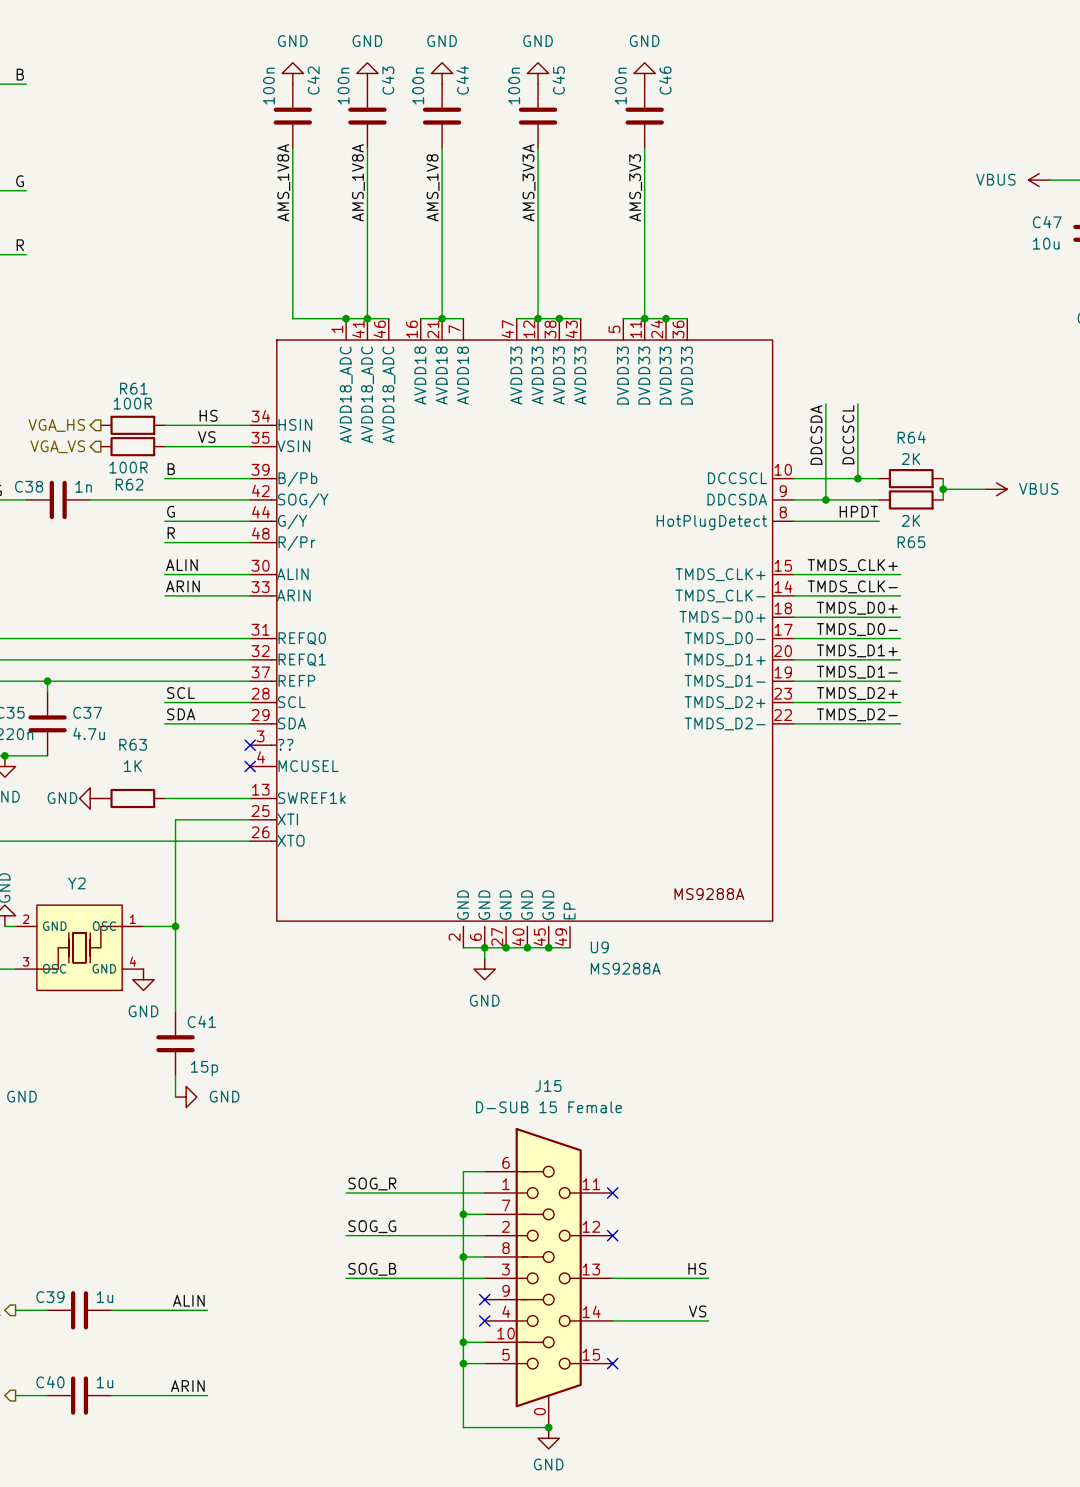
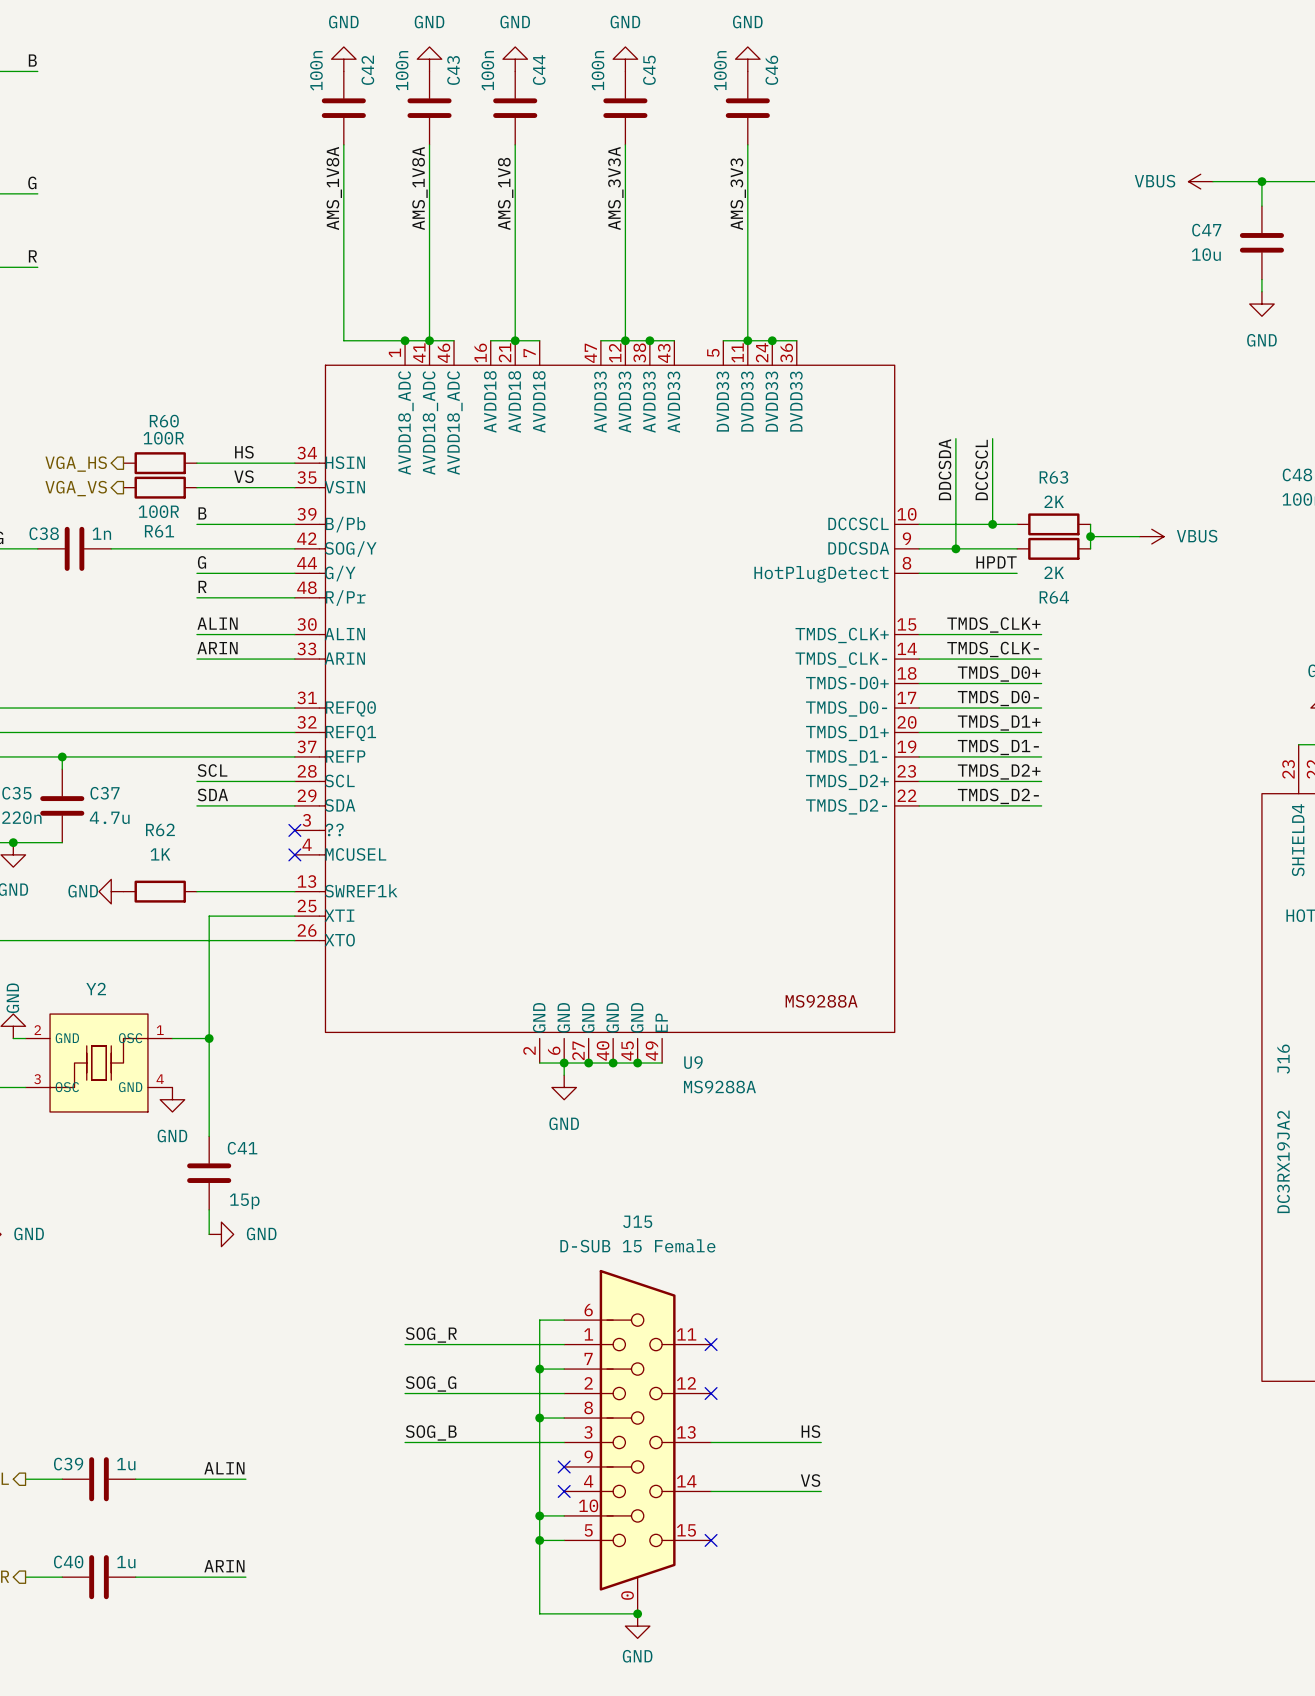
R61 name: R61 (133, 388) -> R60 (164, 421)
R64 name: R64 (911, 437) -> R63 (1053, 477)
R62 name: R62 (129, 484) -> R61 (159, 531)
R65 name: R65 (911, 542) -> R64 (1054, 597)
R63 name: R63 (133, 744) -> R62 (160, 829)

